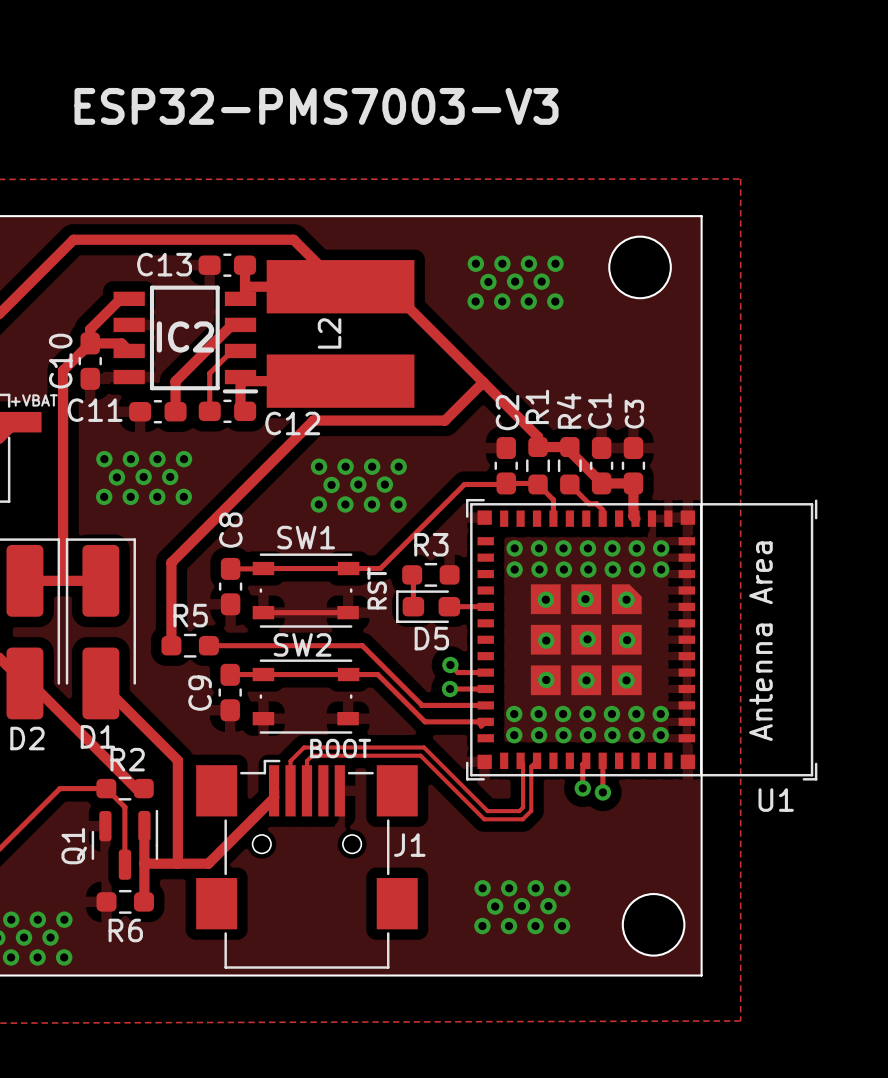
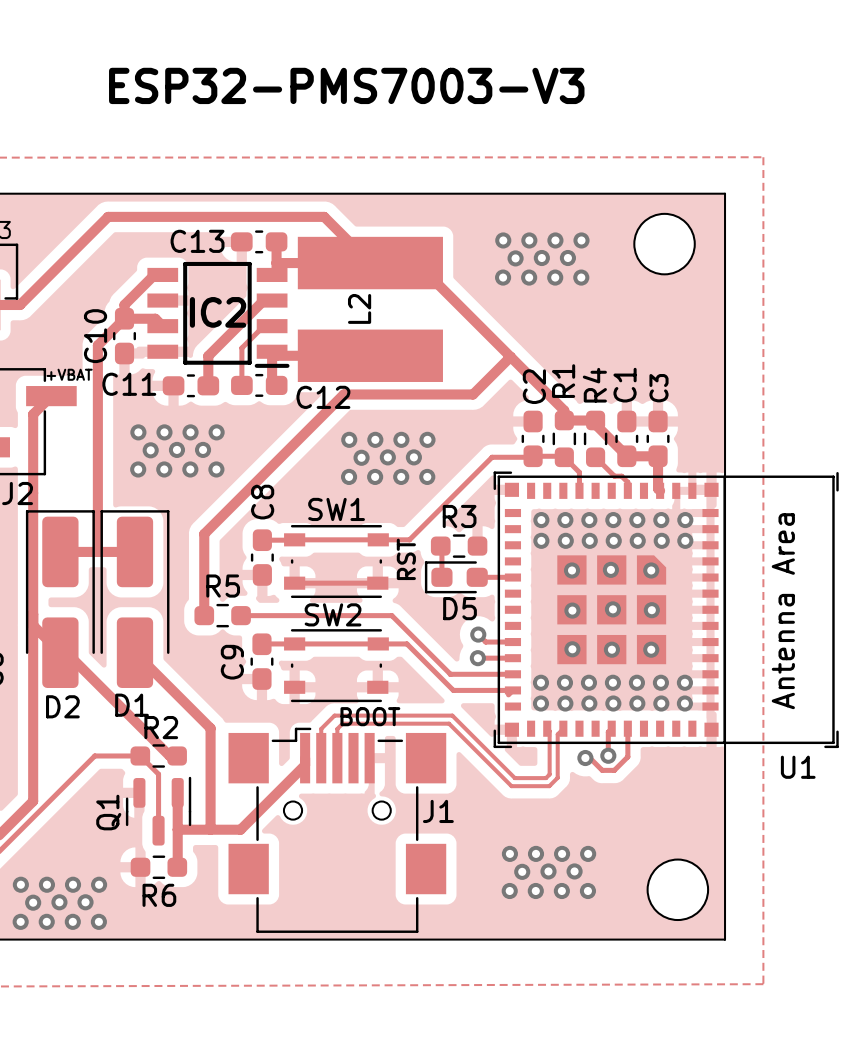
track: (602, 761) (602, 792) -> (627, 728) (627, 756) (614, 770) (602, 770) (589, 758) (585, 758)
via position: (602, 792) -> (585, 758)

